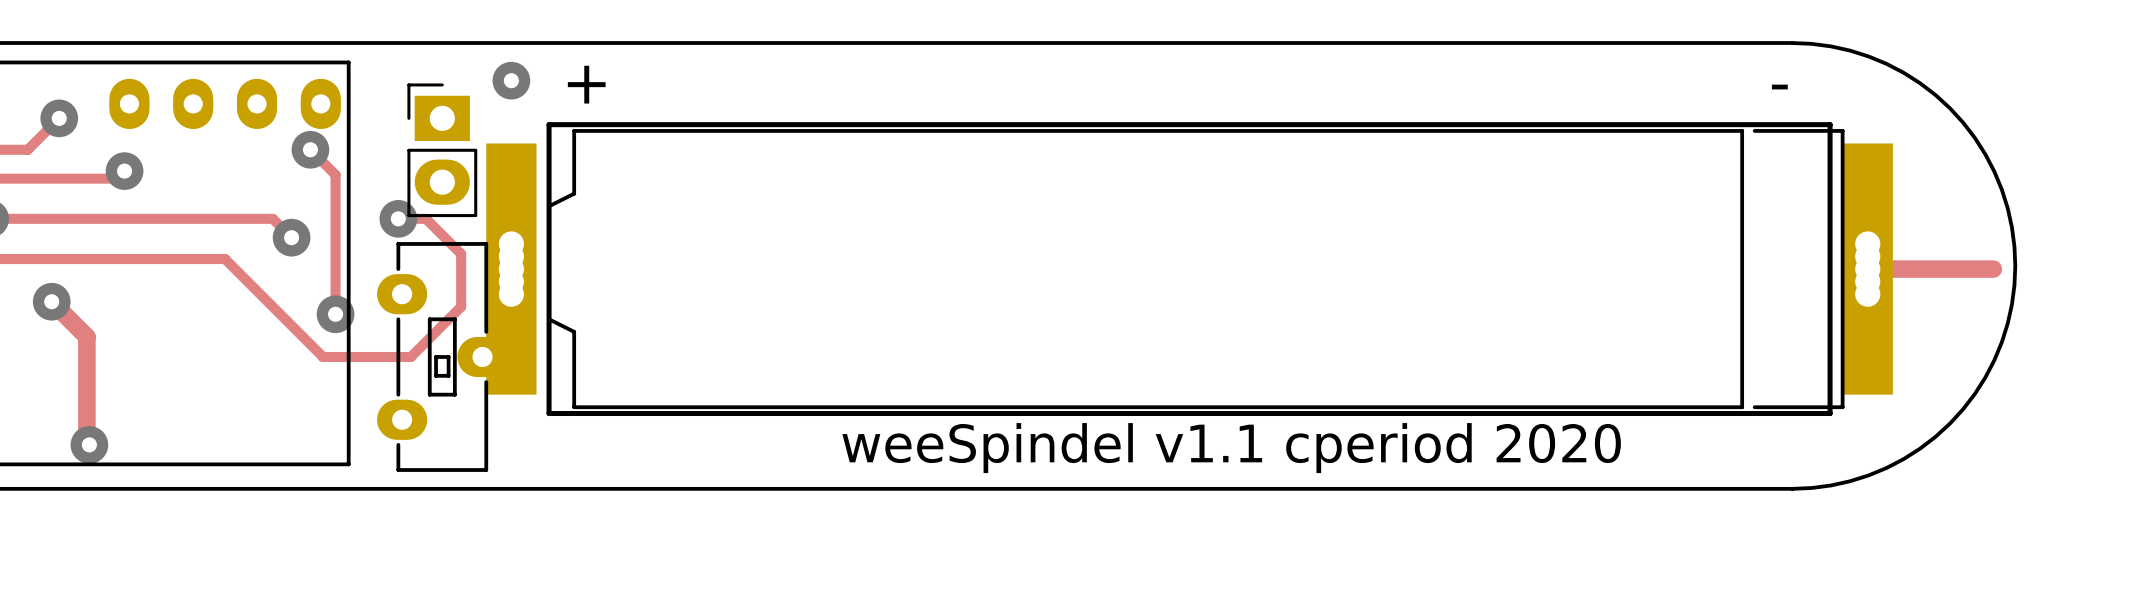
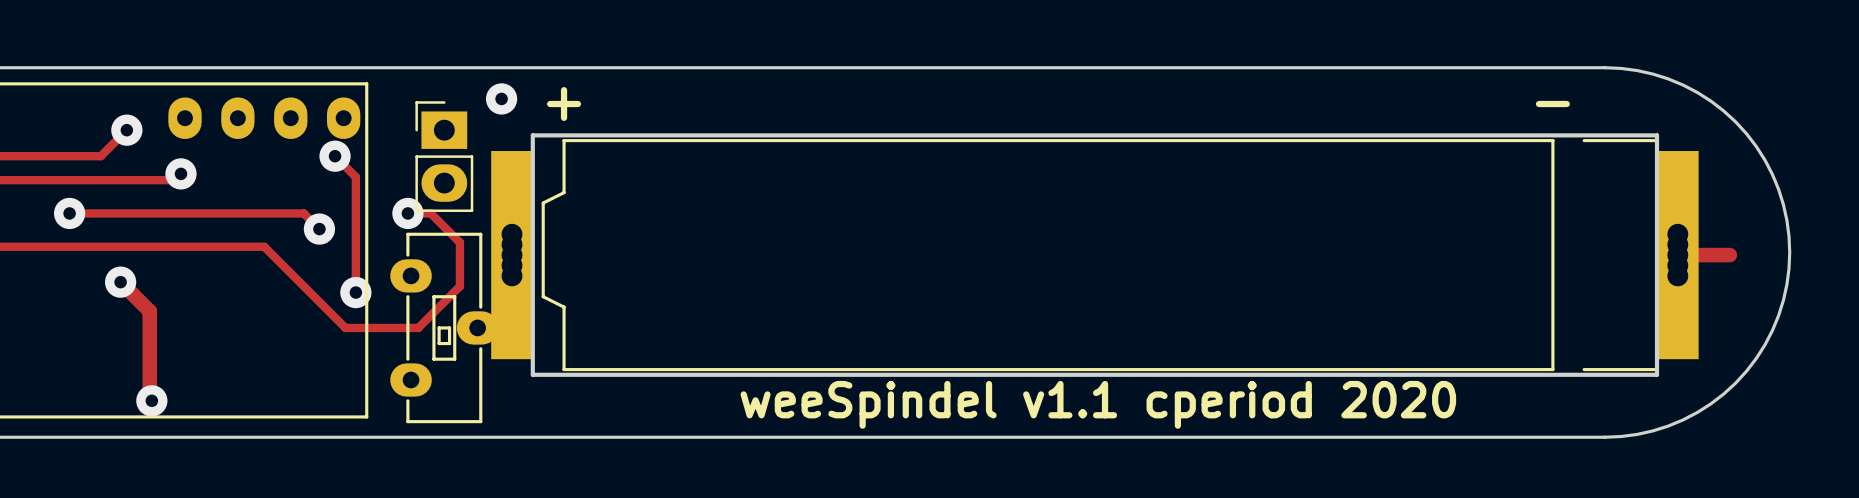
board edge: (1792, 43) (1831, 46) (1868, 56) (1903, 72) (1920, 83) (1950, 108) (1974, 138) (1994, 171) (2007, 208) (2014, 246) (2015, 265) (2014, 285) (2007, 323) (1994, 360) (1974, 393) (1950, 423) (1920, 448) (1903, 458) (1868, 475) (1831, 485) (1792, 488) -> (1563, 67) (1621, 68) (1652, 74) (1697, 92) (1723, 110) (1756, 146) (1772, 174) (1783, 204) (1789, 252) (1783, 300) (1772, 330) (1756, 358) (1723, 394) (1697, 412) (1652, 430) (1621, 436) (1563, 437)
board edge: (1830, 124) (1830, 413) -> (1594, 135) (1657, 135) (1657, 374) (1594, 374)
part: (1189, 269) -> none
part: none -> (1094, 255)
track: (1867, 269) (1930, 269) -> none

